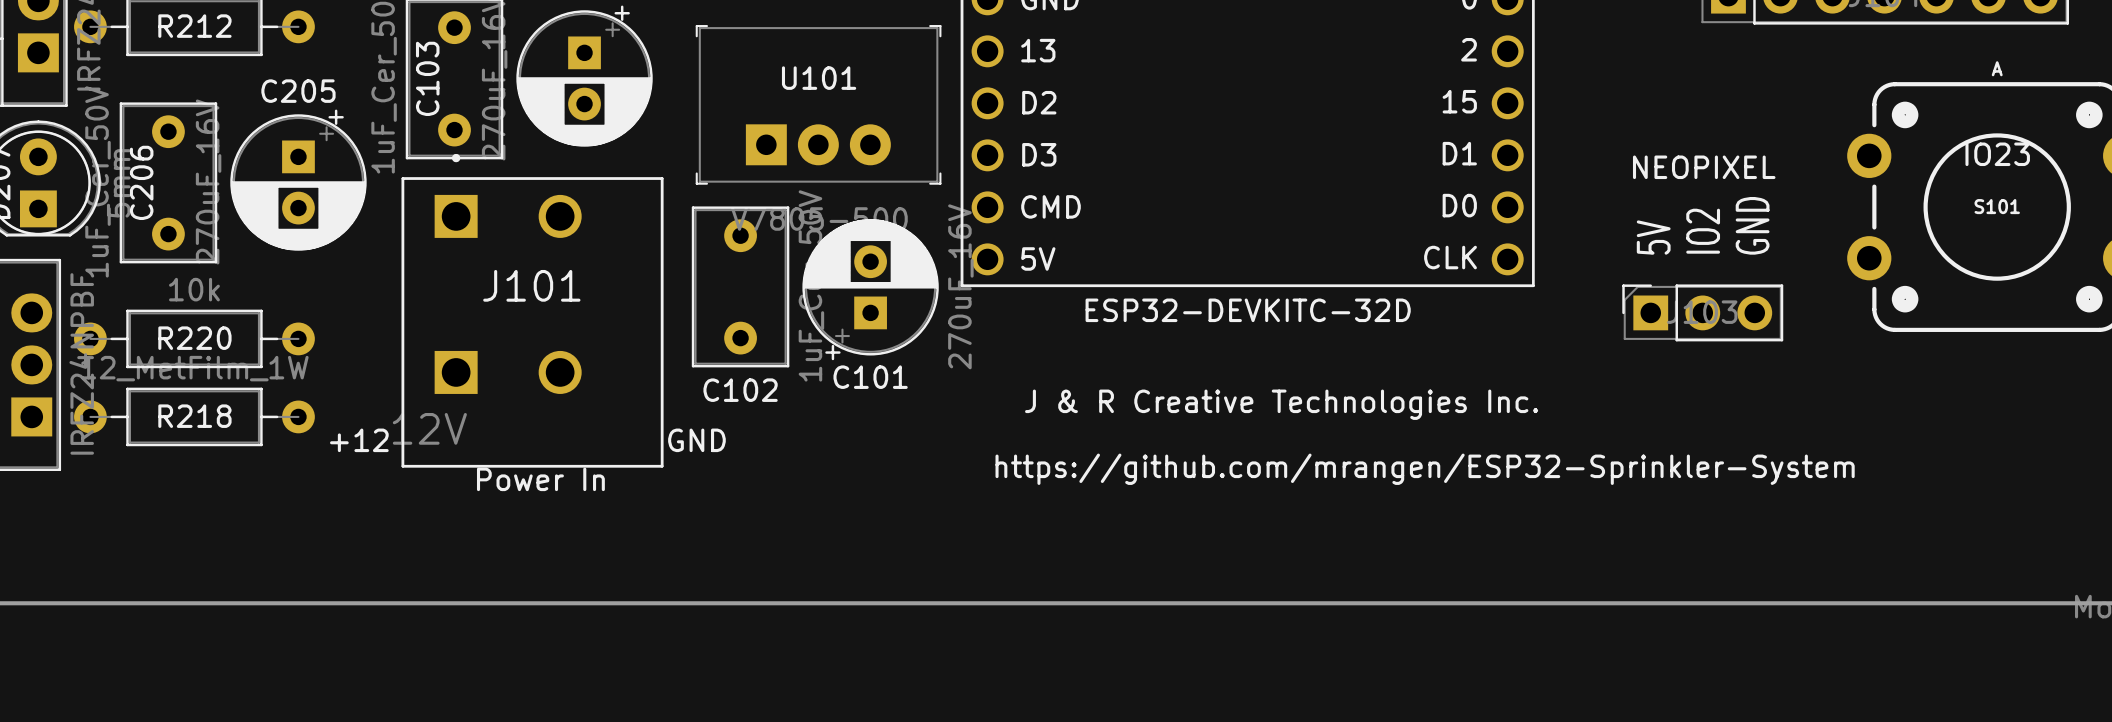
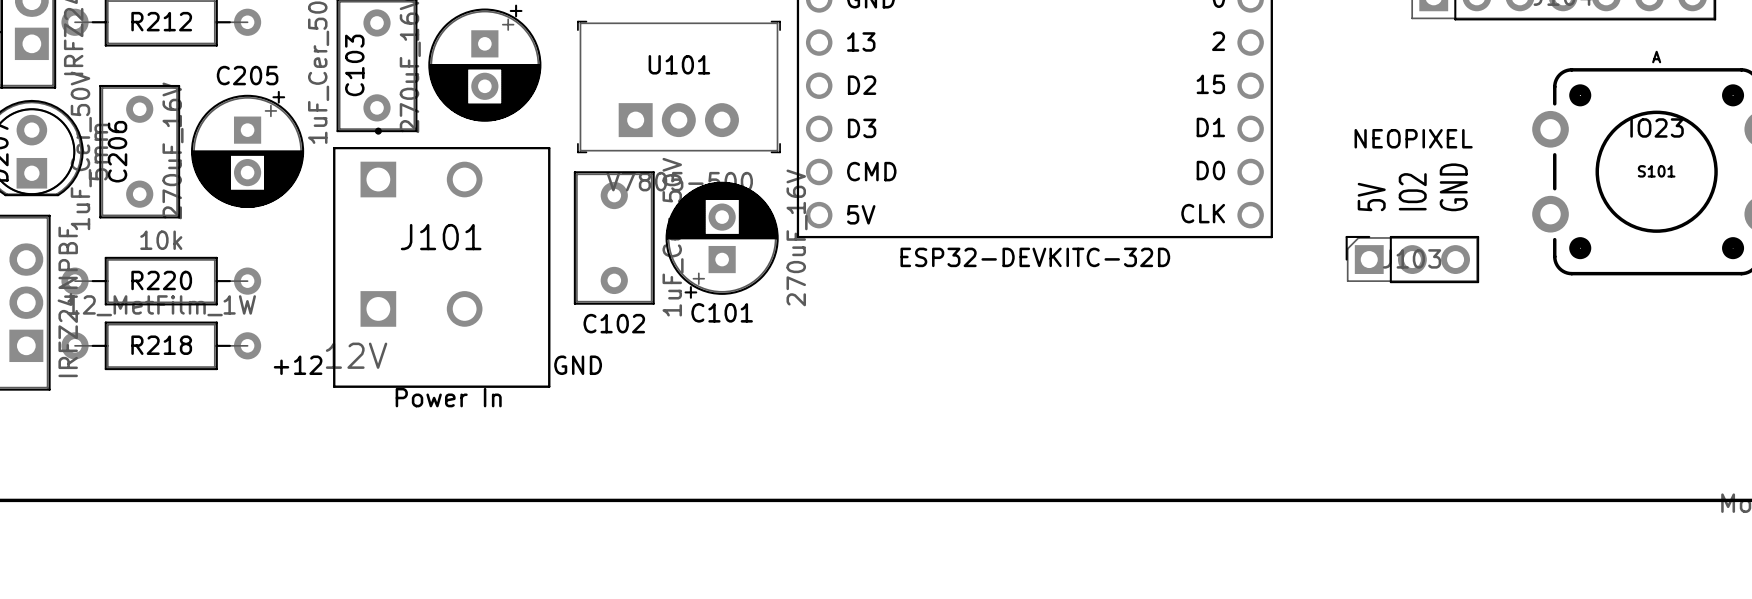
text: J & R Creative Technologies Inc. (1281, 404) -> none
text: https://github.com/mrangen/ESP32-Sprinkler-System (1425, 469) -> none

